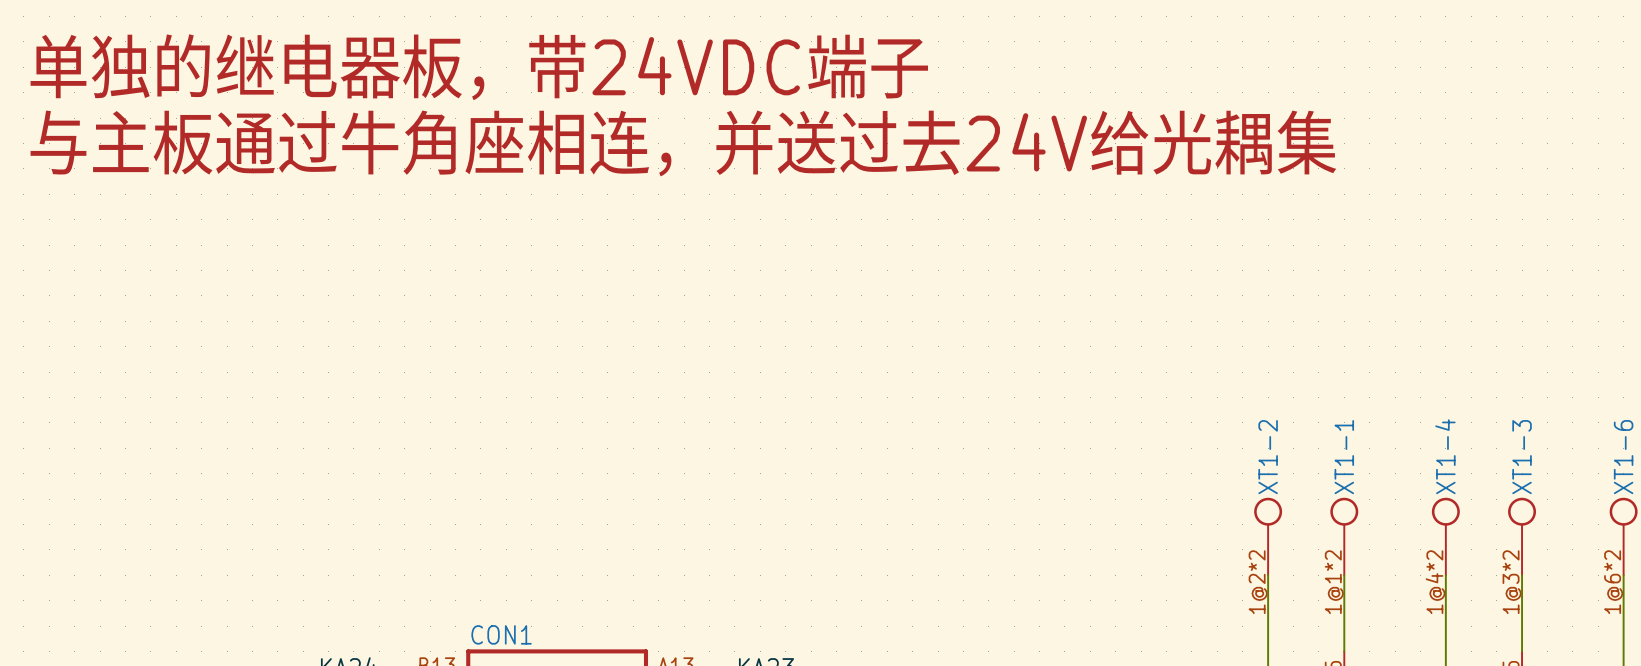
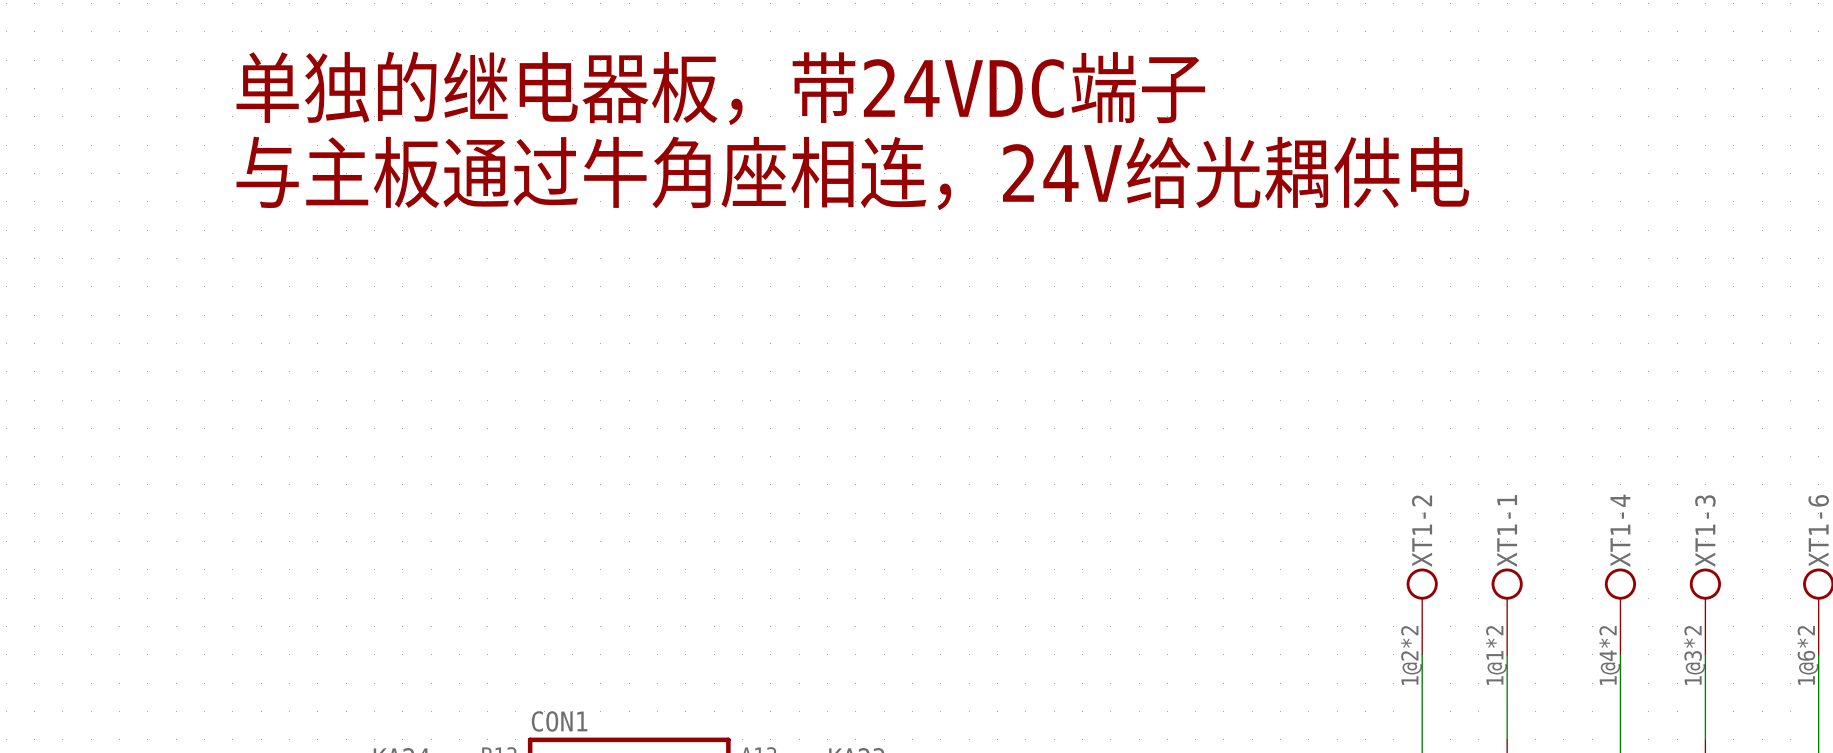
text position: 单独的继电器板，带24VDC端子 (479, 67) -> 单独的继电器板，带24VDC端子 (720, 88)
text: 与主板通过牛角座相连，并送过去24V给光耦集 (683, 143) -> 与主板通过牛角座相连，24V给光耦供电 (852, 173)

